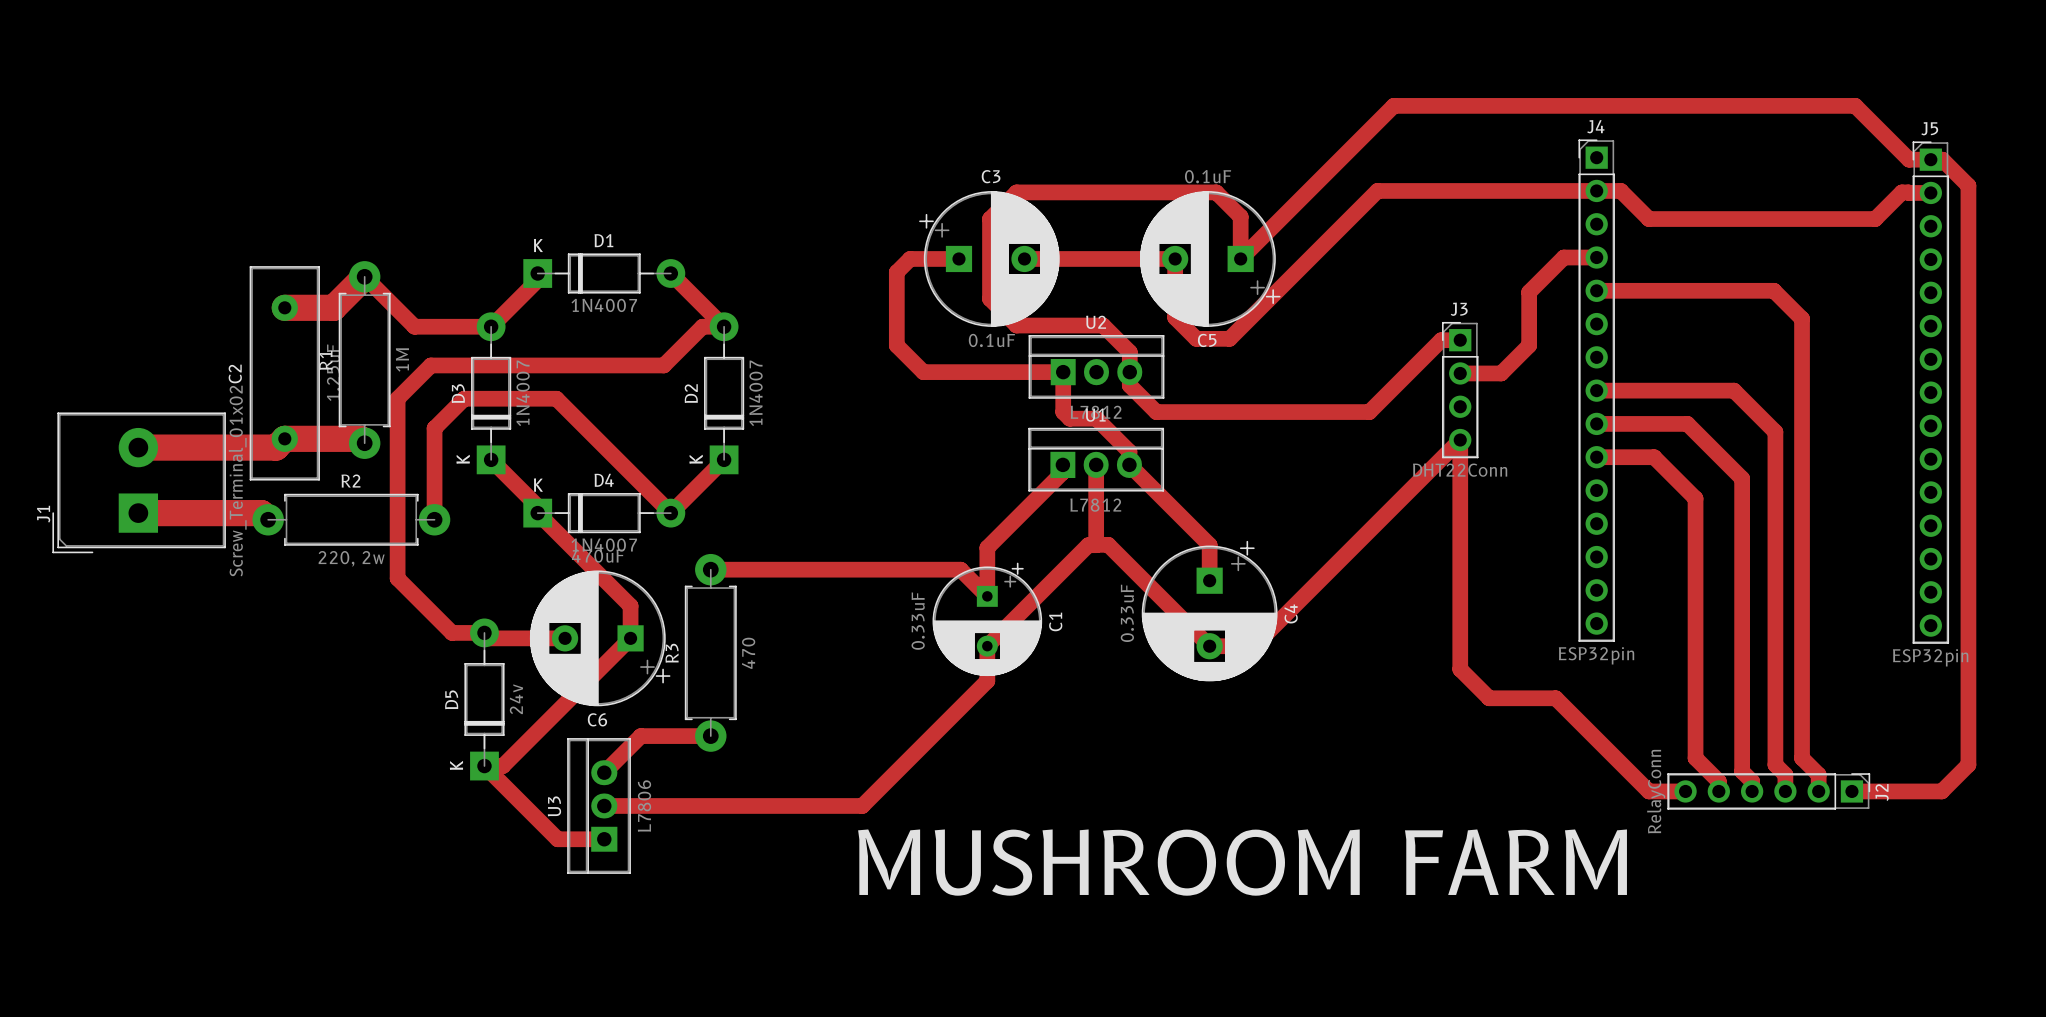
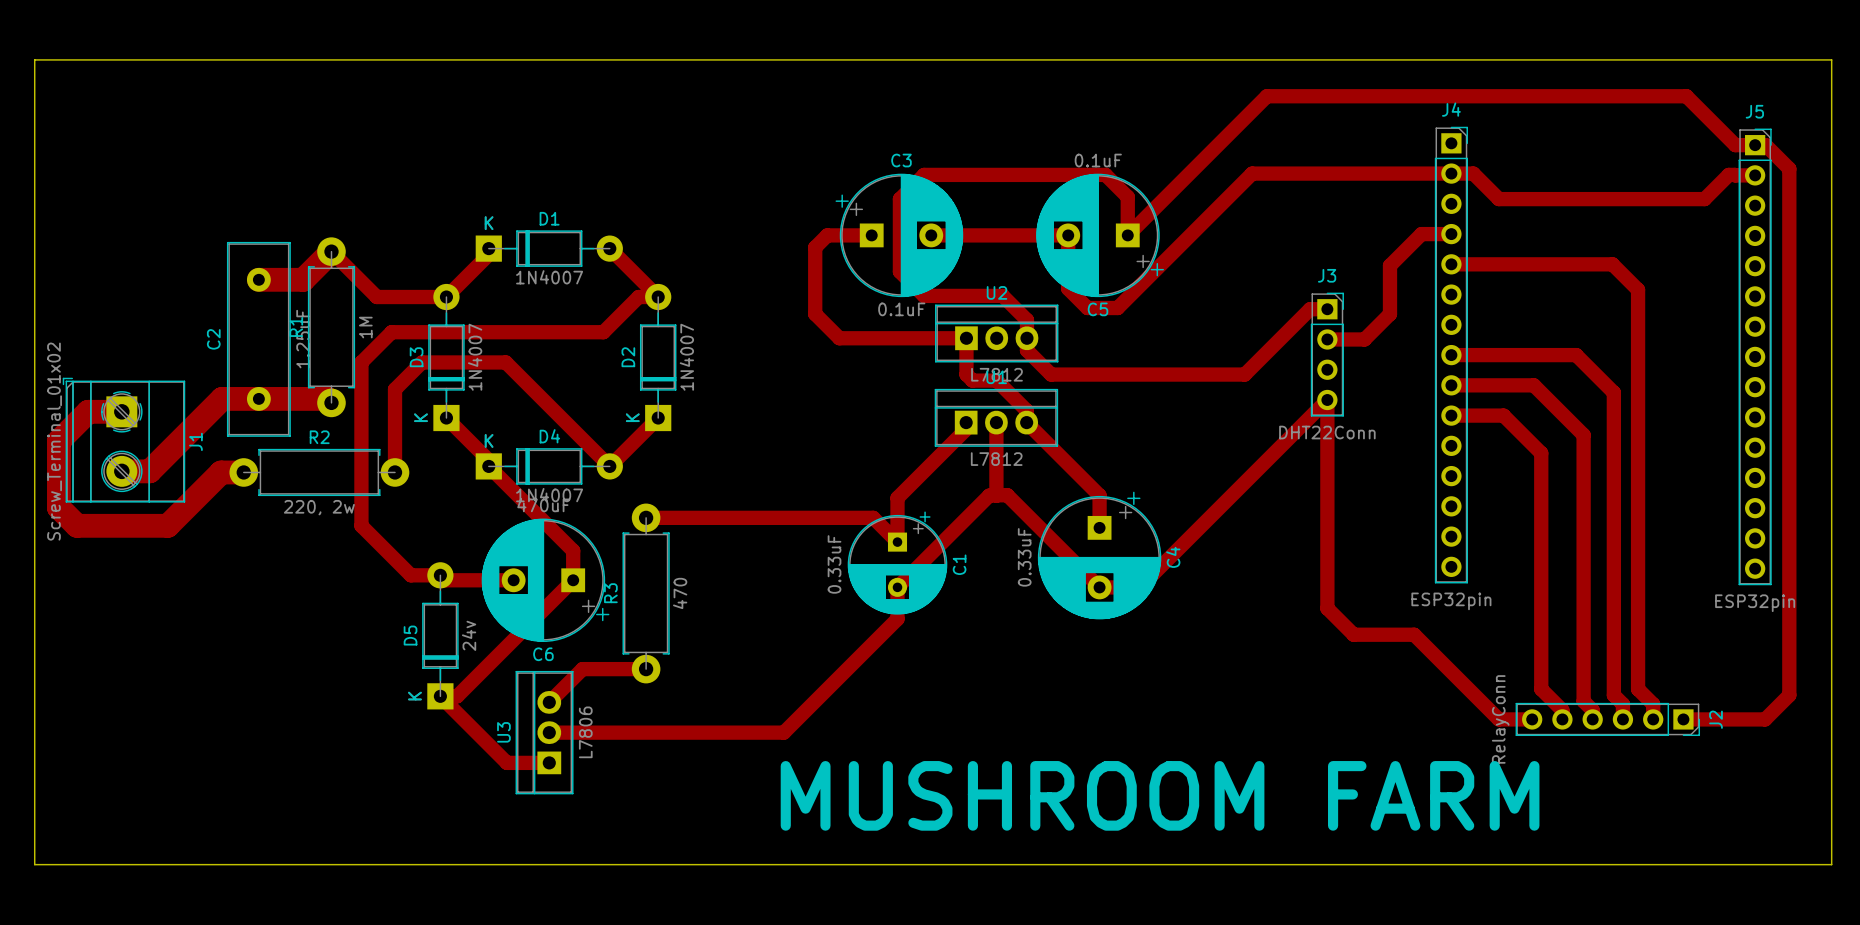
board edge: none -> (34, 59) (1831, 59) (1831, 864) (34, 864) (34, 59)
J4 footprint: [1578, 139, 1615, 642] -> [1434, 126, 1468, 584]
J5 footprint: [1912, 141, 1950, 644] -> [1738, 128, 1772, 586]
J3 footprint: [1442, 321, 1479, 459] -> [1310, 292, 1344, 417]
J1 footprint: [52, 412, 226, 554] -> [62, 377, 186, 503]
top track: (284, 438) (276, 447) (138, 447) -> (258, 398) (222, 398) (149, 471) (121, 471)
J1 value position: Screw_Terminal_01x02 (237, 481) -> Screw_Terminal_01x02 (54, 441)
top track: (138, 513) (261, 513) (268, 519) -> (121, 411) (88, 411) (58, 441) (58, 507) (77, 525) (167, 525) (221, 472) (243, 472)
J1 name position: J1 (43, 514) -> J1 (195, 441)
J2 footprint: [1667, 773, 1871, 810] -> [1515, 702, 1701, 736]
text position: MUSHROOM FARM (1242, 862) -> MUSHROOM FARM (1160, 795)

